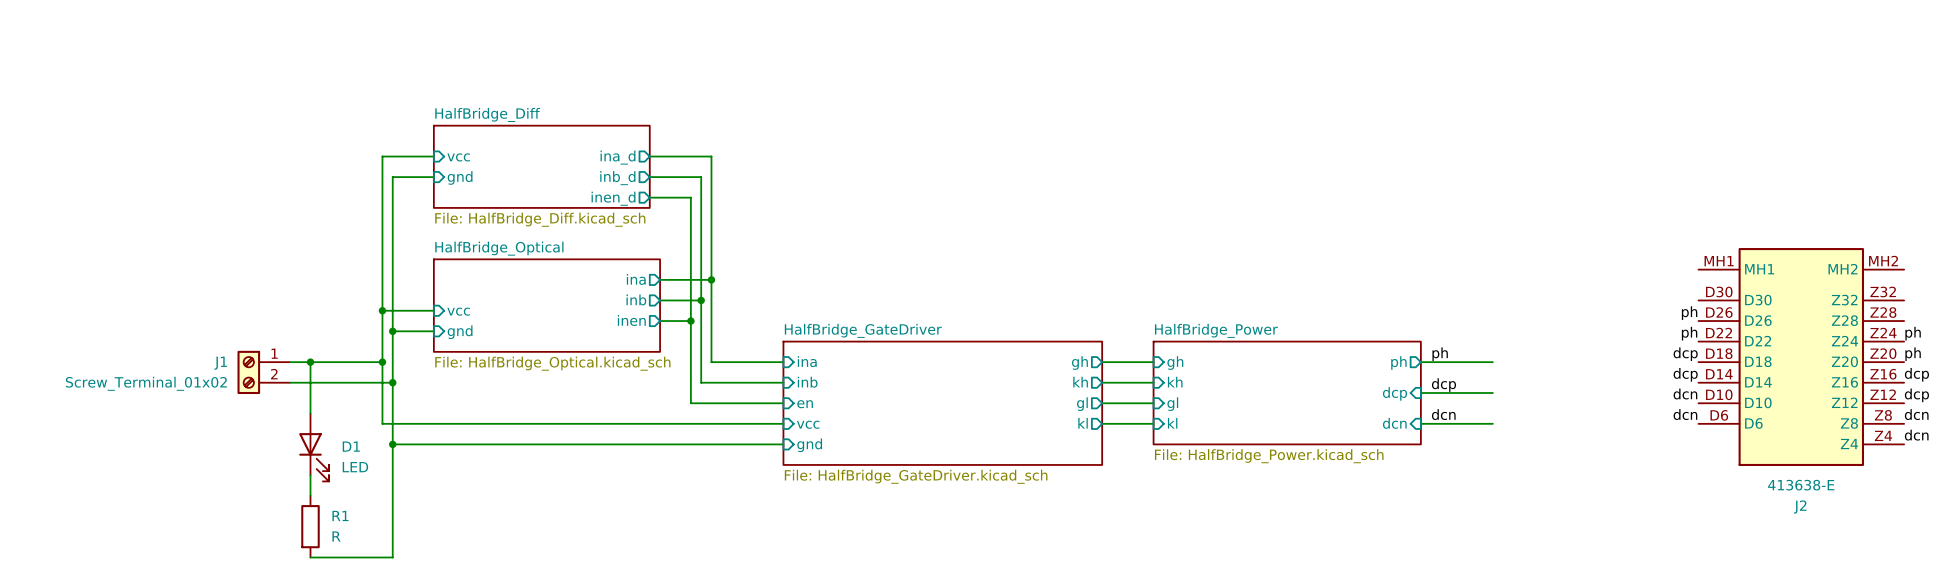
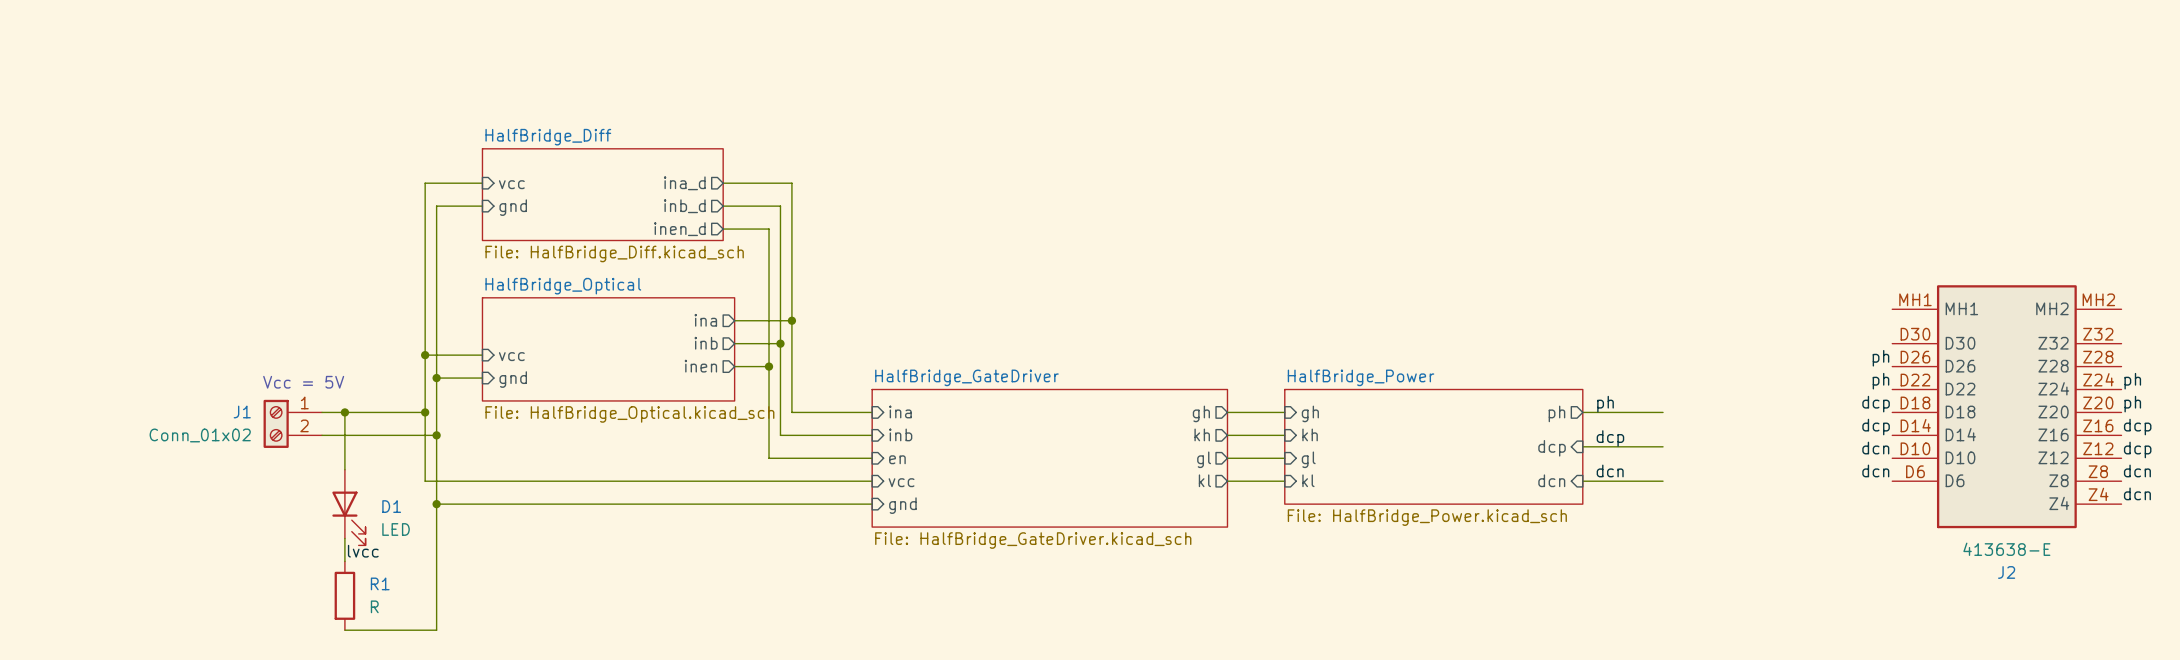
text: none -> Vcc = 5V (303, 382)
J1 value: Screw_Terminal_01x02 (146, 383) -> Conn_01x02 (200, 435)
label: none -> lvcc (363, 551)

